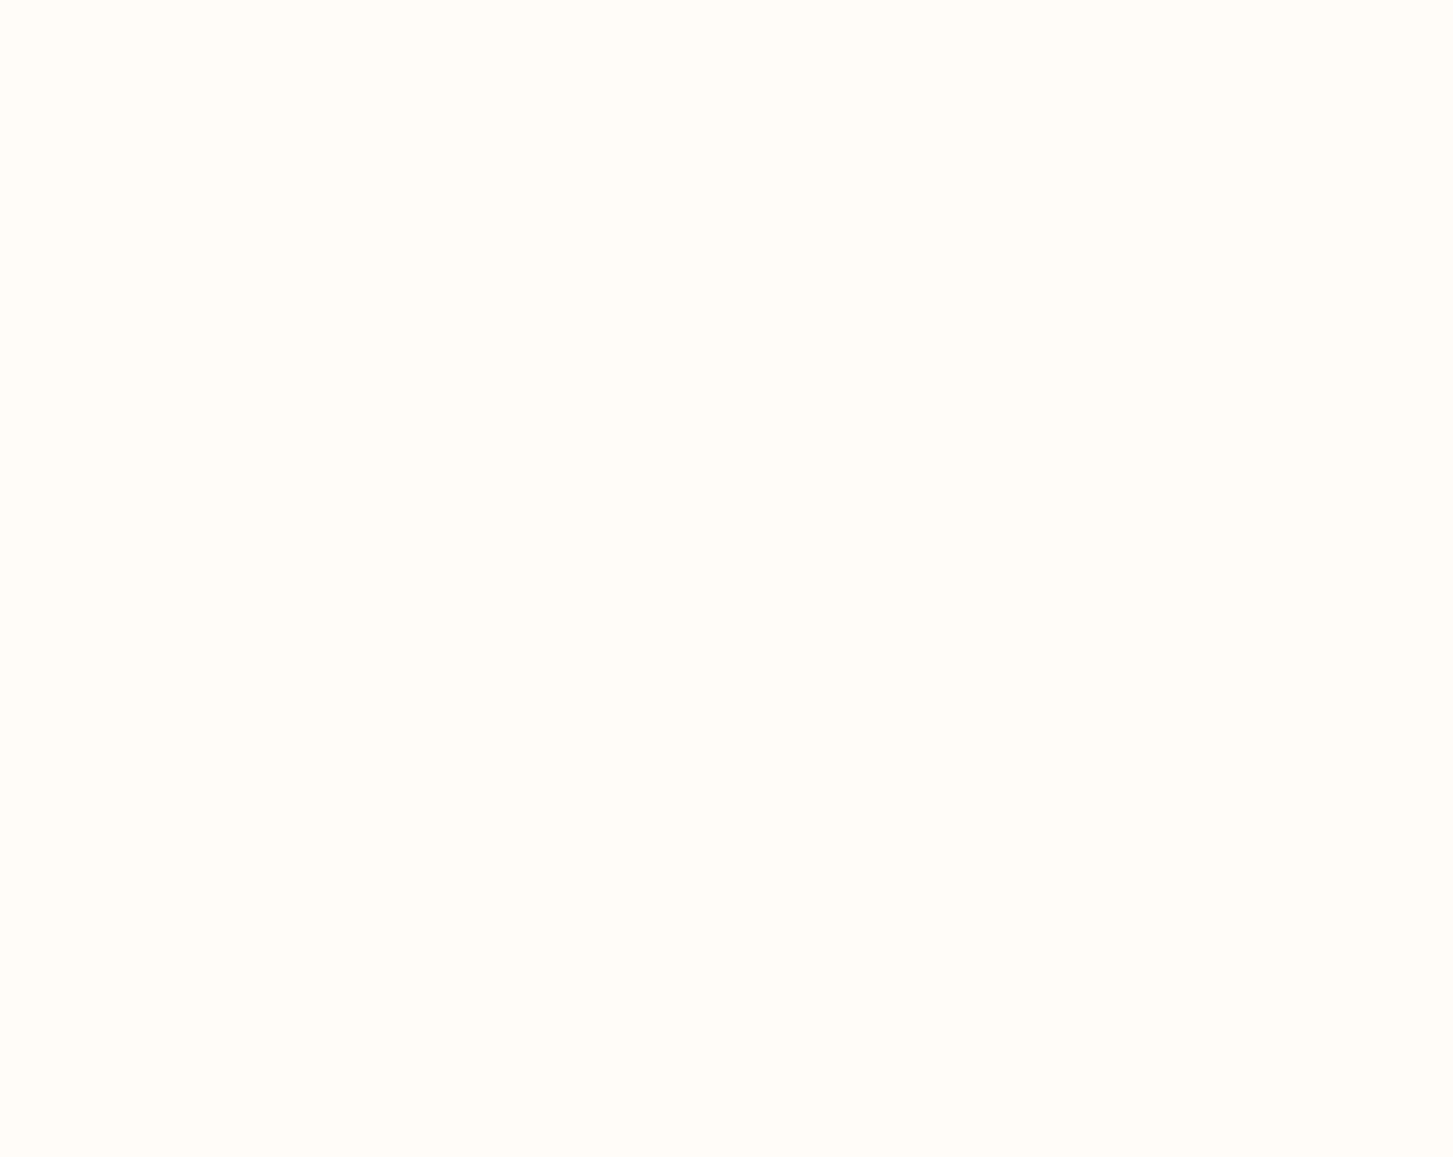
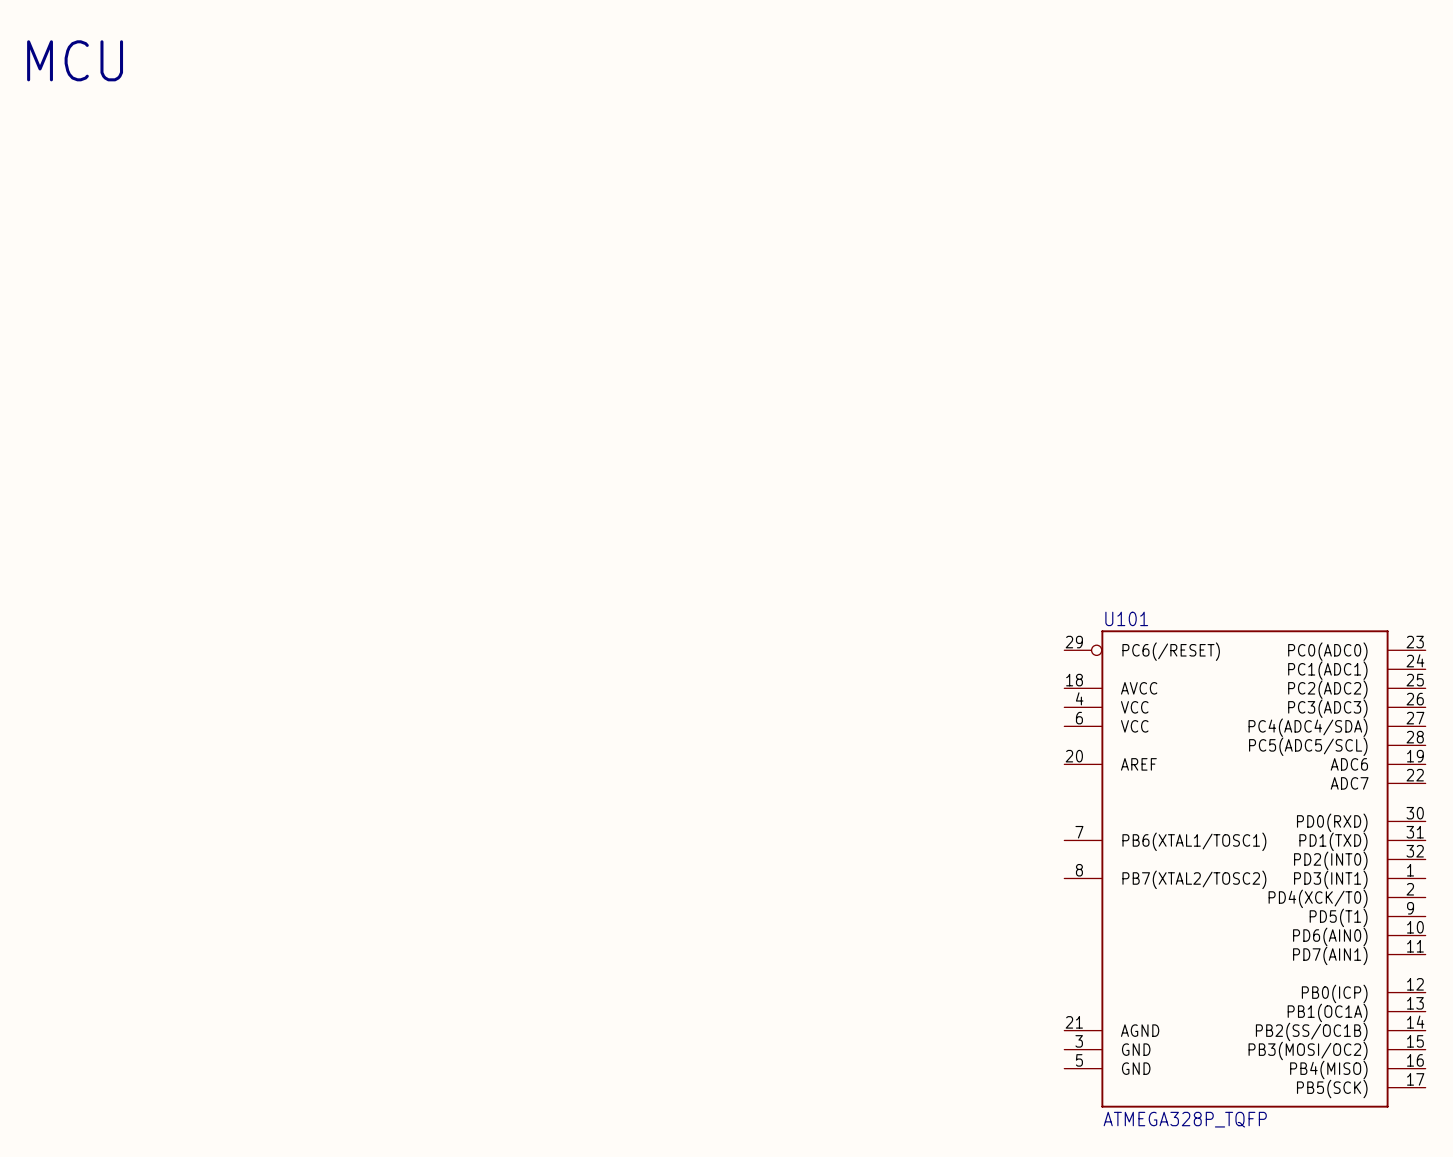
text: none -> MCU (75, 60)
U101: none -> ATMEGA328P_TQFP (1244, 868)

